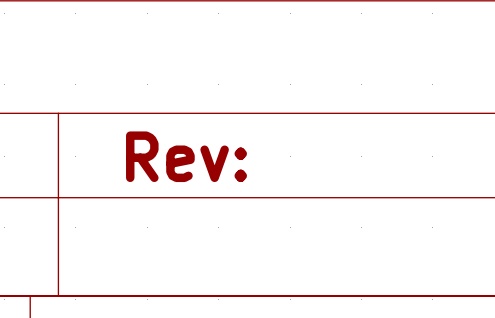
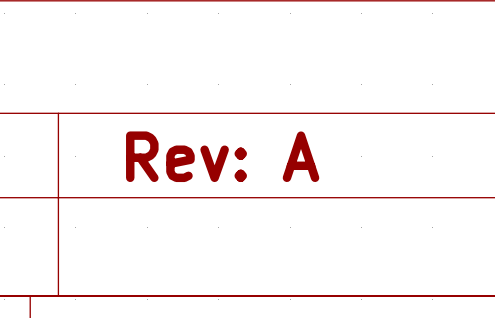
title block: Rev: (186, 156) -> Rev: A (222, 156)

